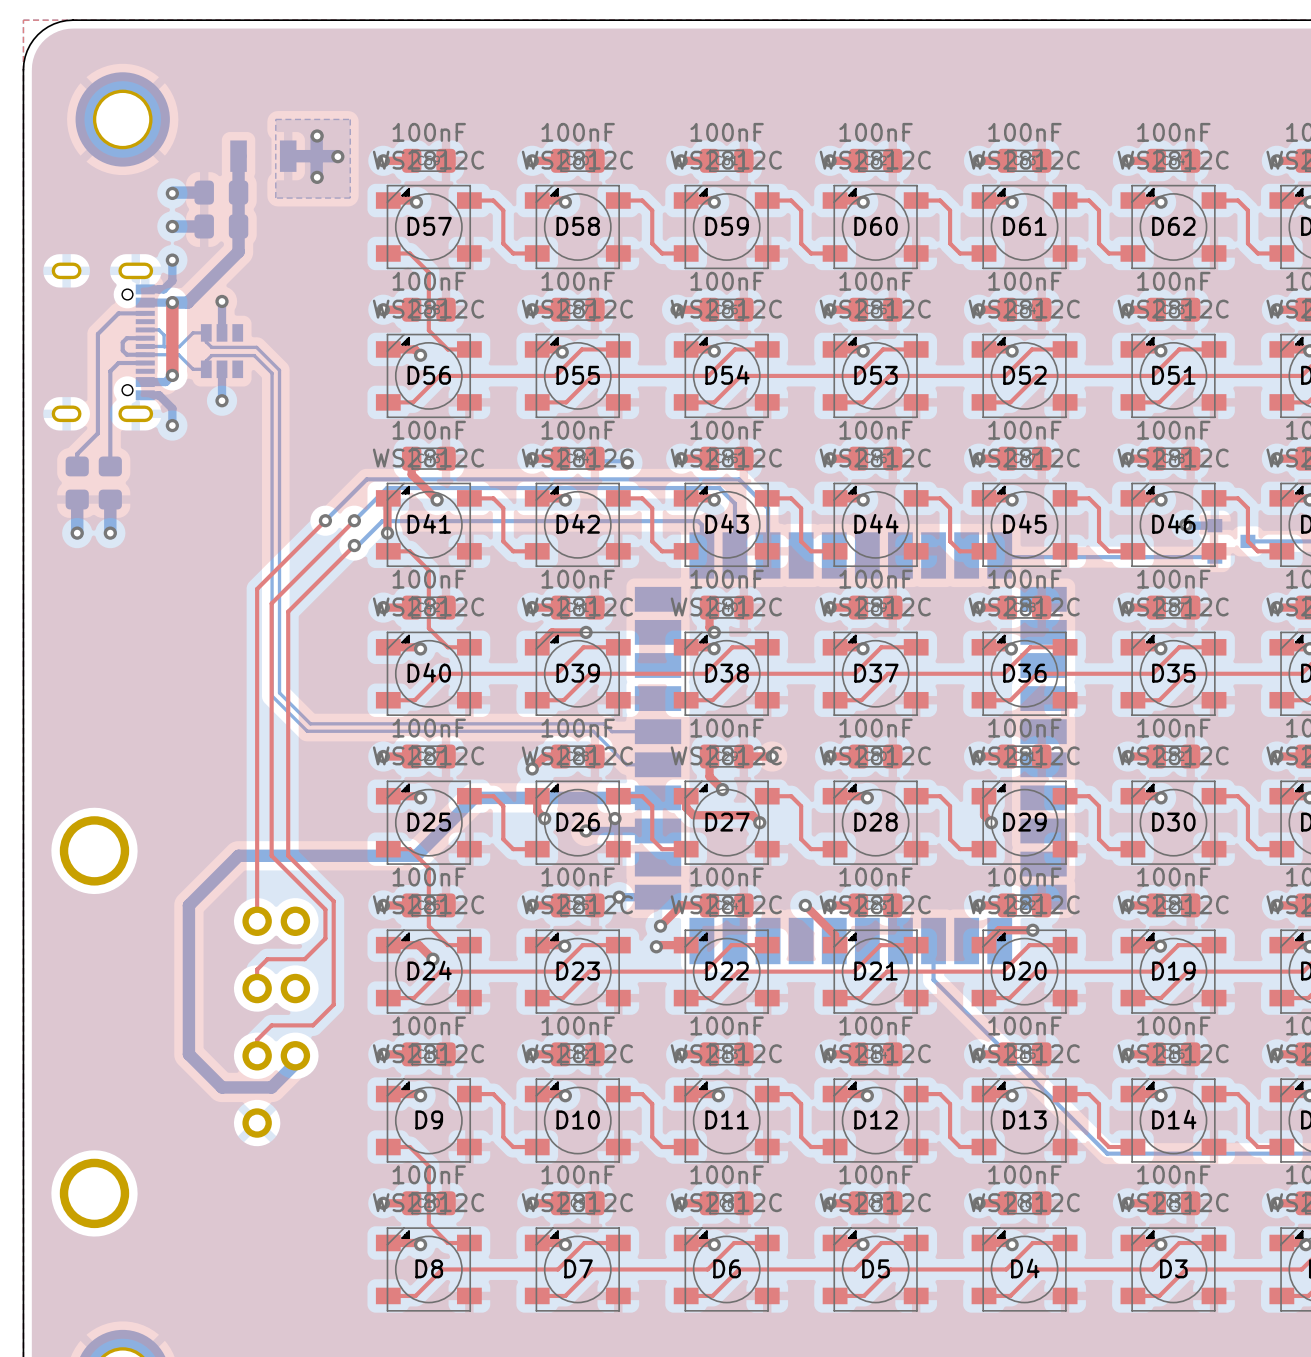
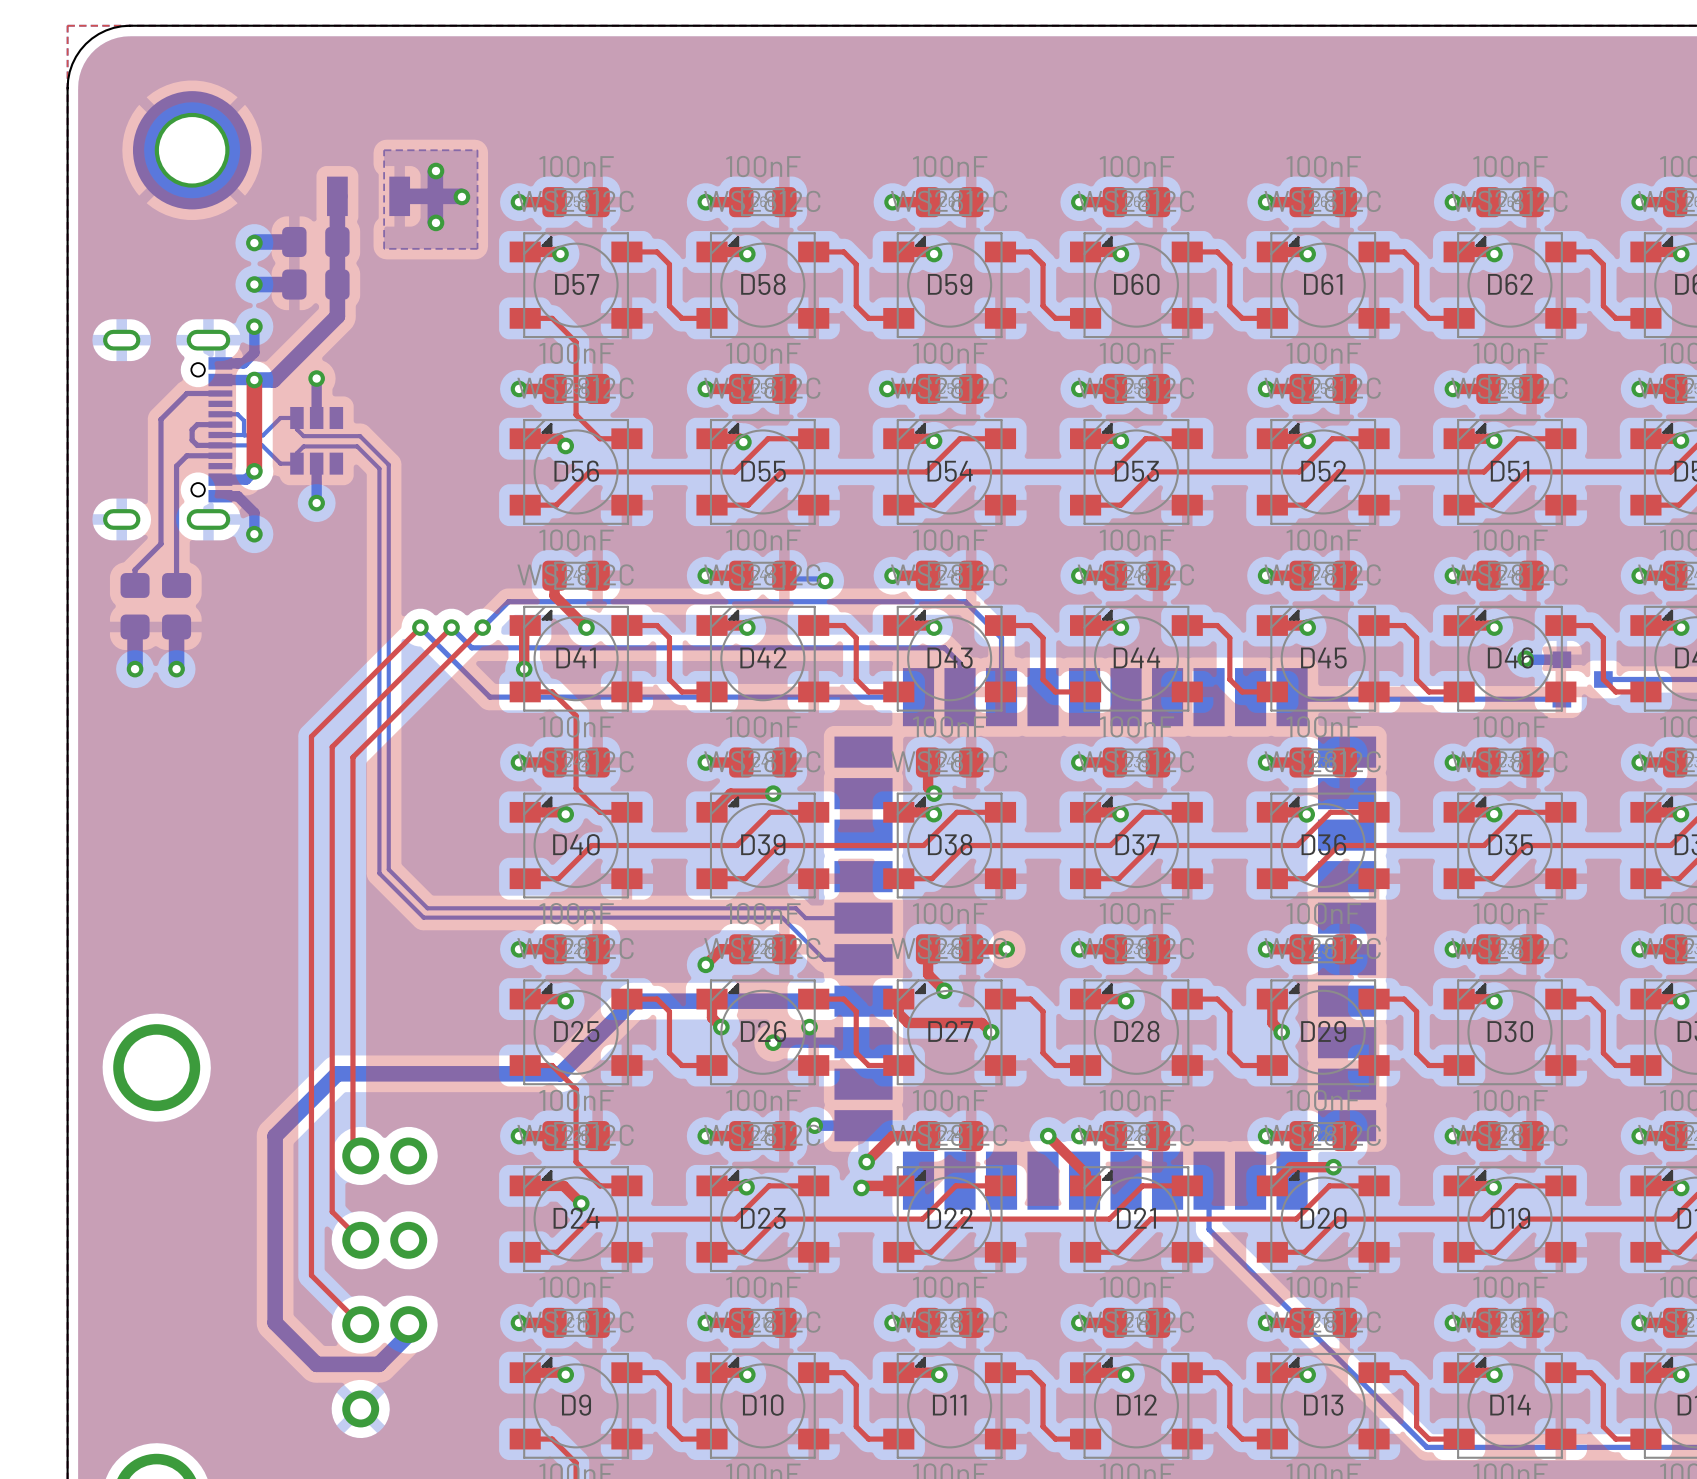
bottom track: (375, 479) (366, 479) (325, 520) -> (508, 601) (482, 627)
via: none -> (420, 627)
via: none -> (451, 627)
via: none -> (482, 627)
top track: (325, 520) (257, 589) (257, 921) -> (482, 627) (352, 757) (352, 1148) (360, 1155)
via: (325, 520) -> none
bottom track: (354, 520) (387, 488) (719, 488) (734, 503) (734, 528) -> (451, 627) (471, 647) (944, 647) (960, 663)
top track: (354, 520) (271, 603) (271, 855) (325, 909) (325, 938) (304, 959) (267, 959) (257, 969) (257, 988) -> (451, 627) (332, 746) (332, 1211) (360, 1240)
via: (354, 520) -> none
bottom track: (354, 545) (358, 545) (382, 521) (698, 521) (701, 524) (701, 555) -> (420, 632) (420, 627) (489, 697) (918, 697)
top track: (354, 545) (288, 611) (288, 855) (333, 901) (333, 1004) (313, 1025) (271, 1025) (257, 1039) (257, 1055) -> (420, 630) (420, 627) (311, 736) (311, 1275) (360, 1324)
via: (354, 545) -> none

